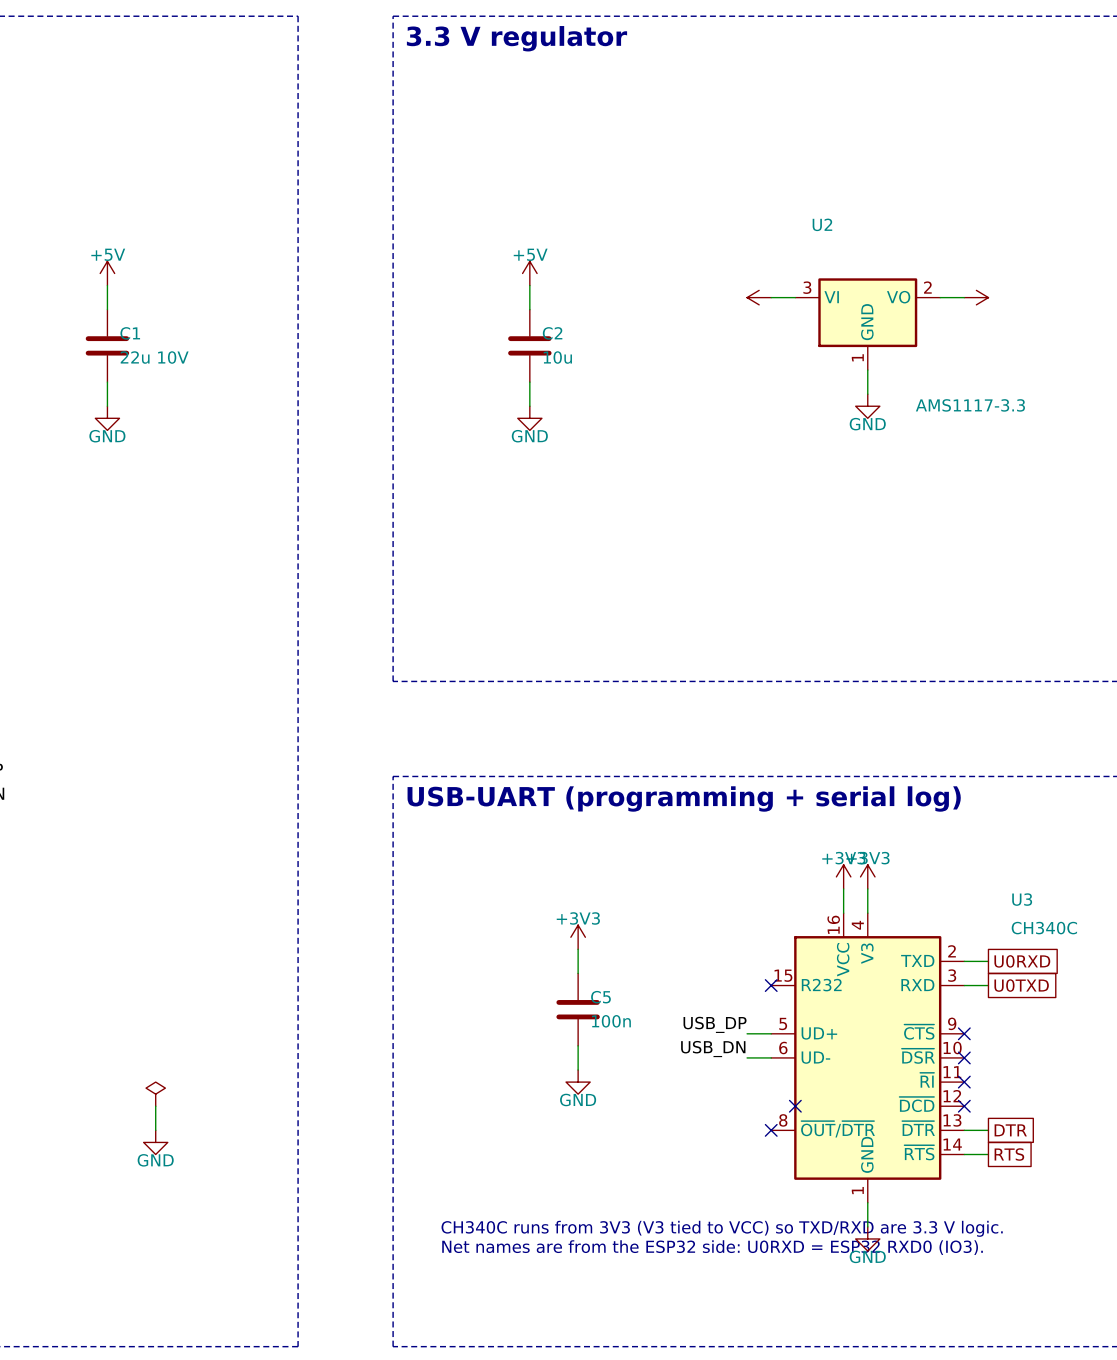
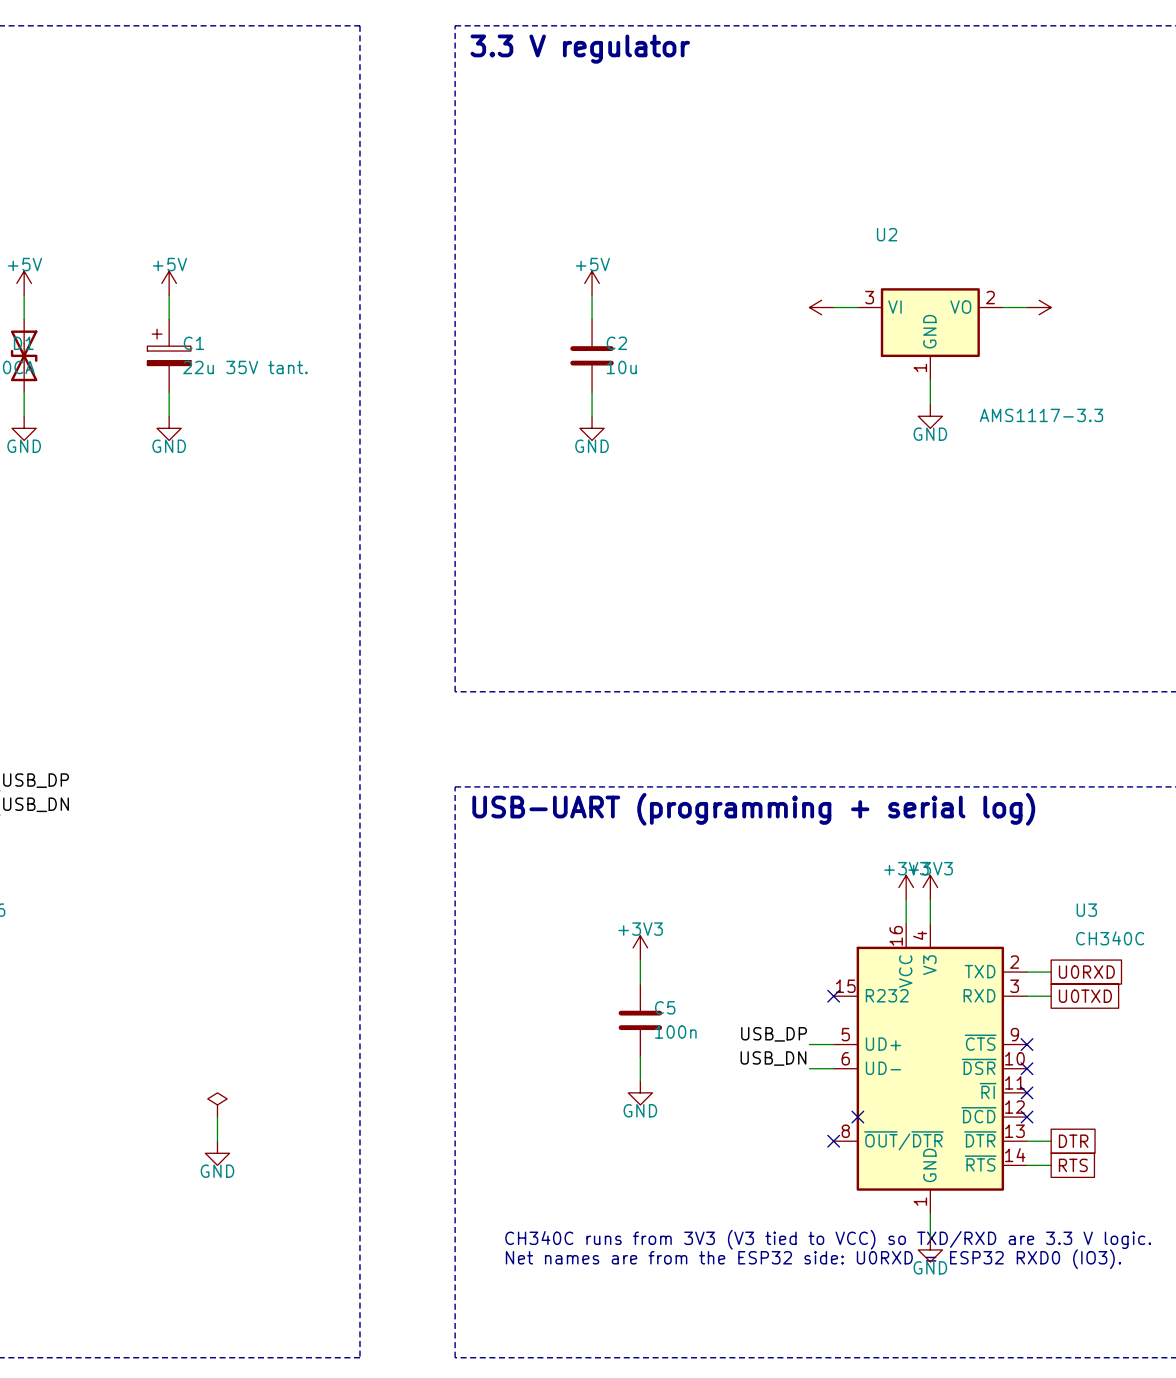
C1 symbol: [85, 309, 130, 383] -> [147, 319, 191, 393]
C1 value: 22u 10V (154, 357) -> 22u 35V tant. (245, 367)

